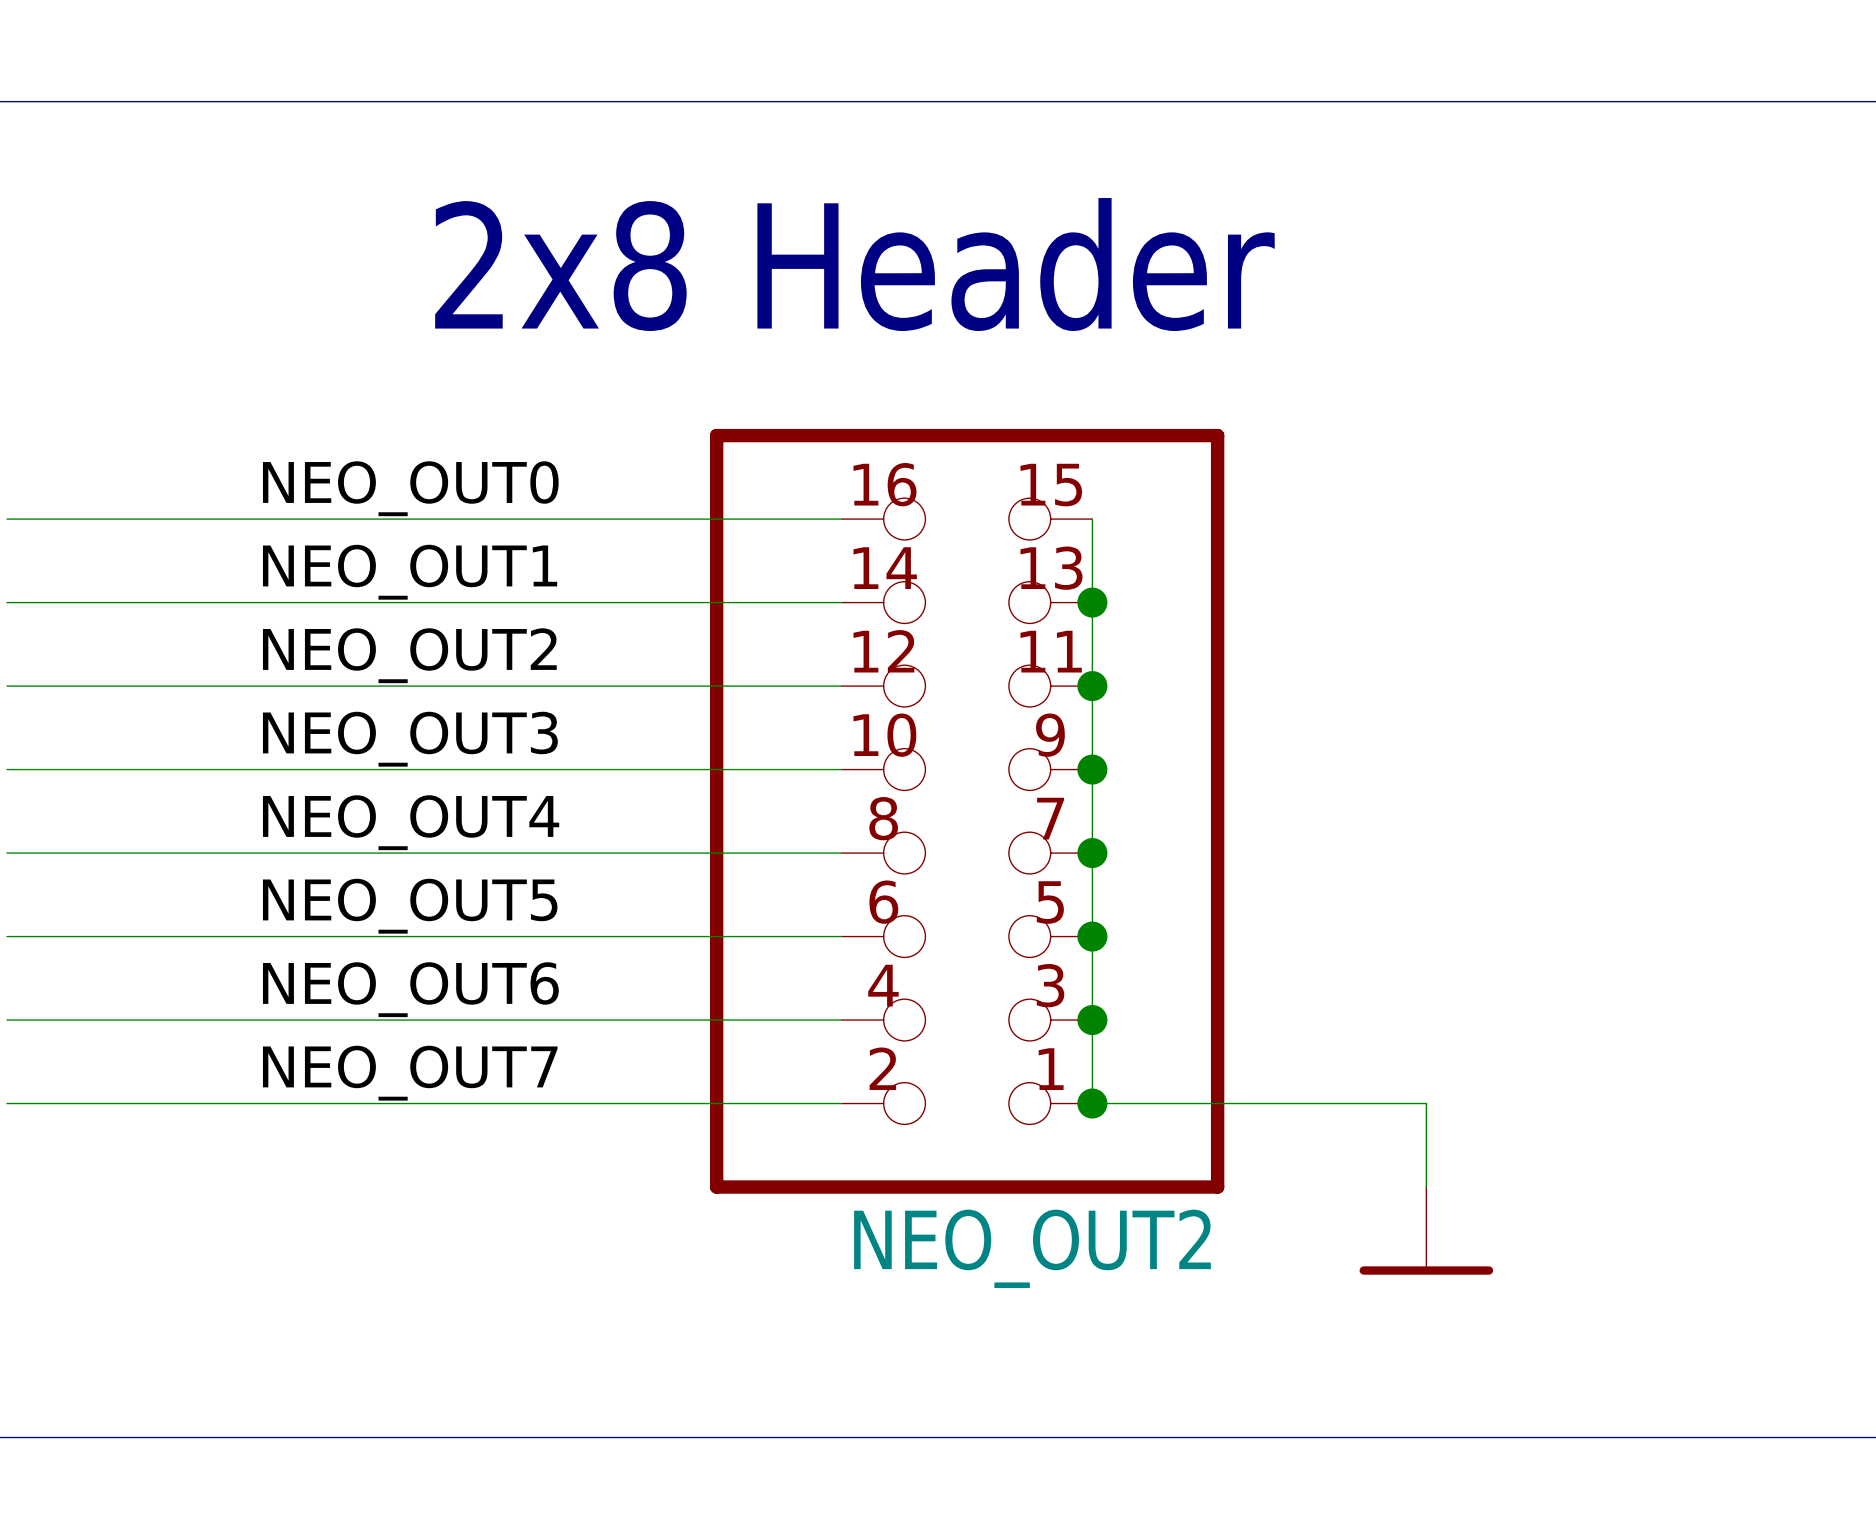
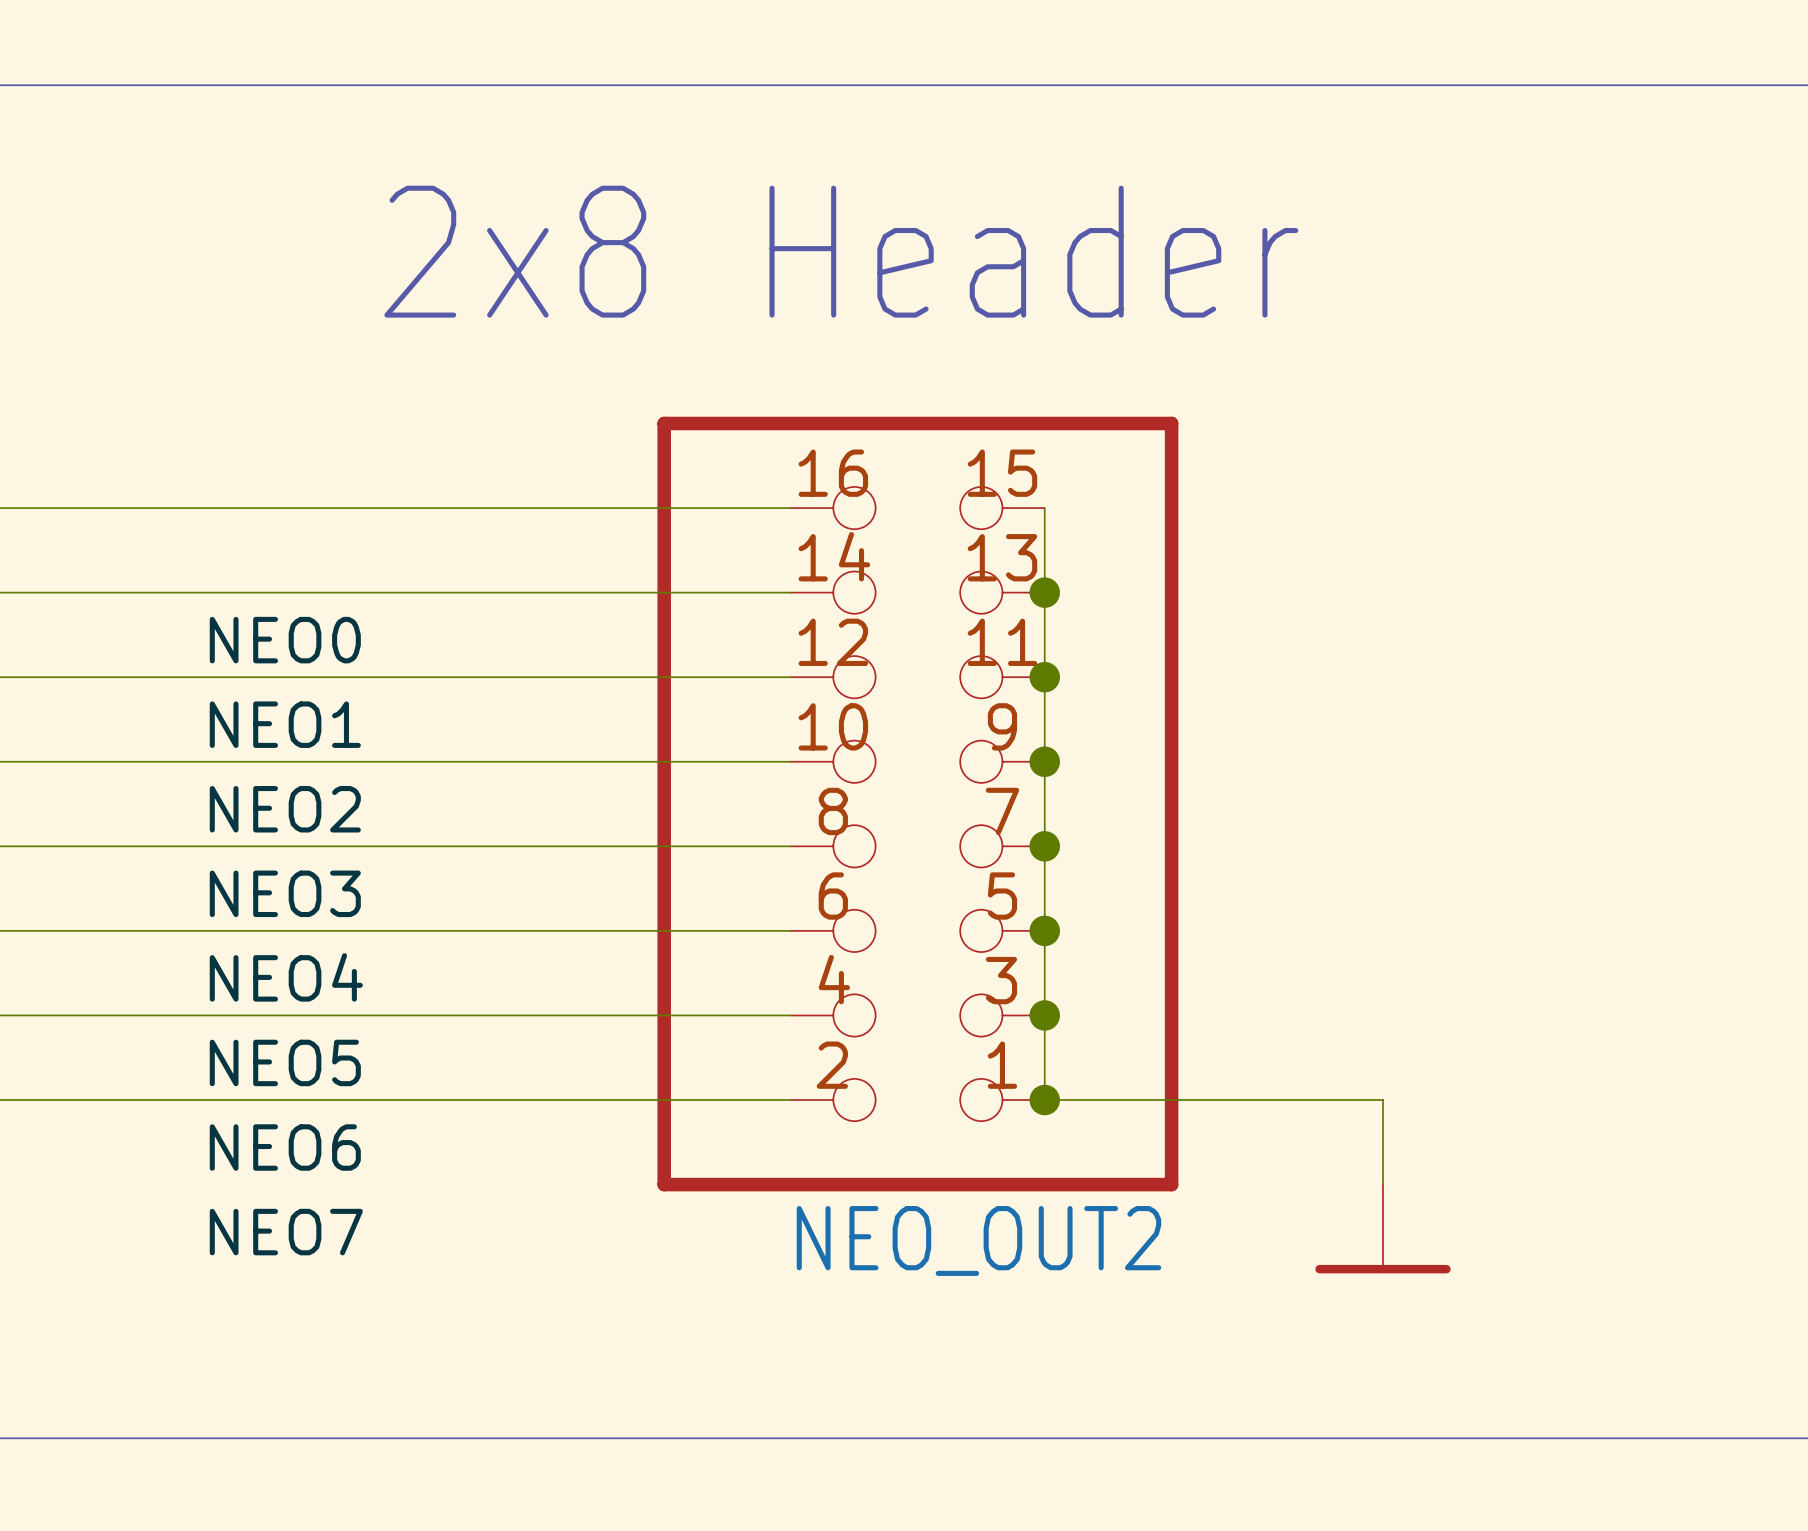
label: NEO_OUT0 (410, 488) -> none
label: NEO_OUT1 (410, 572) -> none
label: NEO_OUT2 (409, 655) -> NEO0 (285, 640)
label: NEO_OUT3 (410, 739) -> NEO1 (285, 724)
label: NEO_OUT4 (411, 822) -> NEO2 (285, 809)
label: NEO_OUT5 (410, 906) -> NEO3 (285, 893)
label: NEO_OUT6 (410, 989) -> NEO4 (286, 977)
label: NEO_OUT7 (410, 1073) -> NEO5 (285, 1062)
label: none -> NEO6 (285, 1147)
label: none -> NEO7 (286, 1232)

